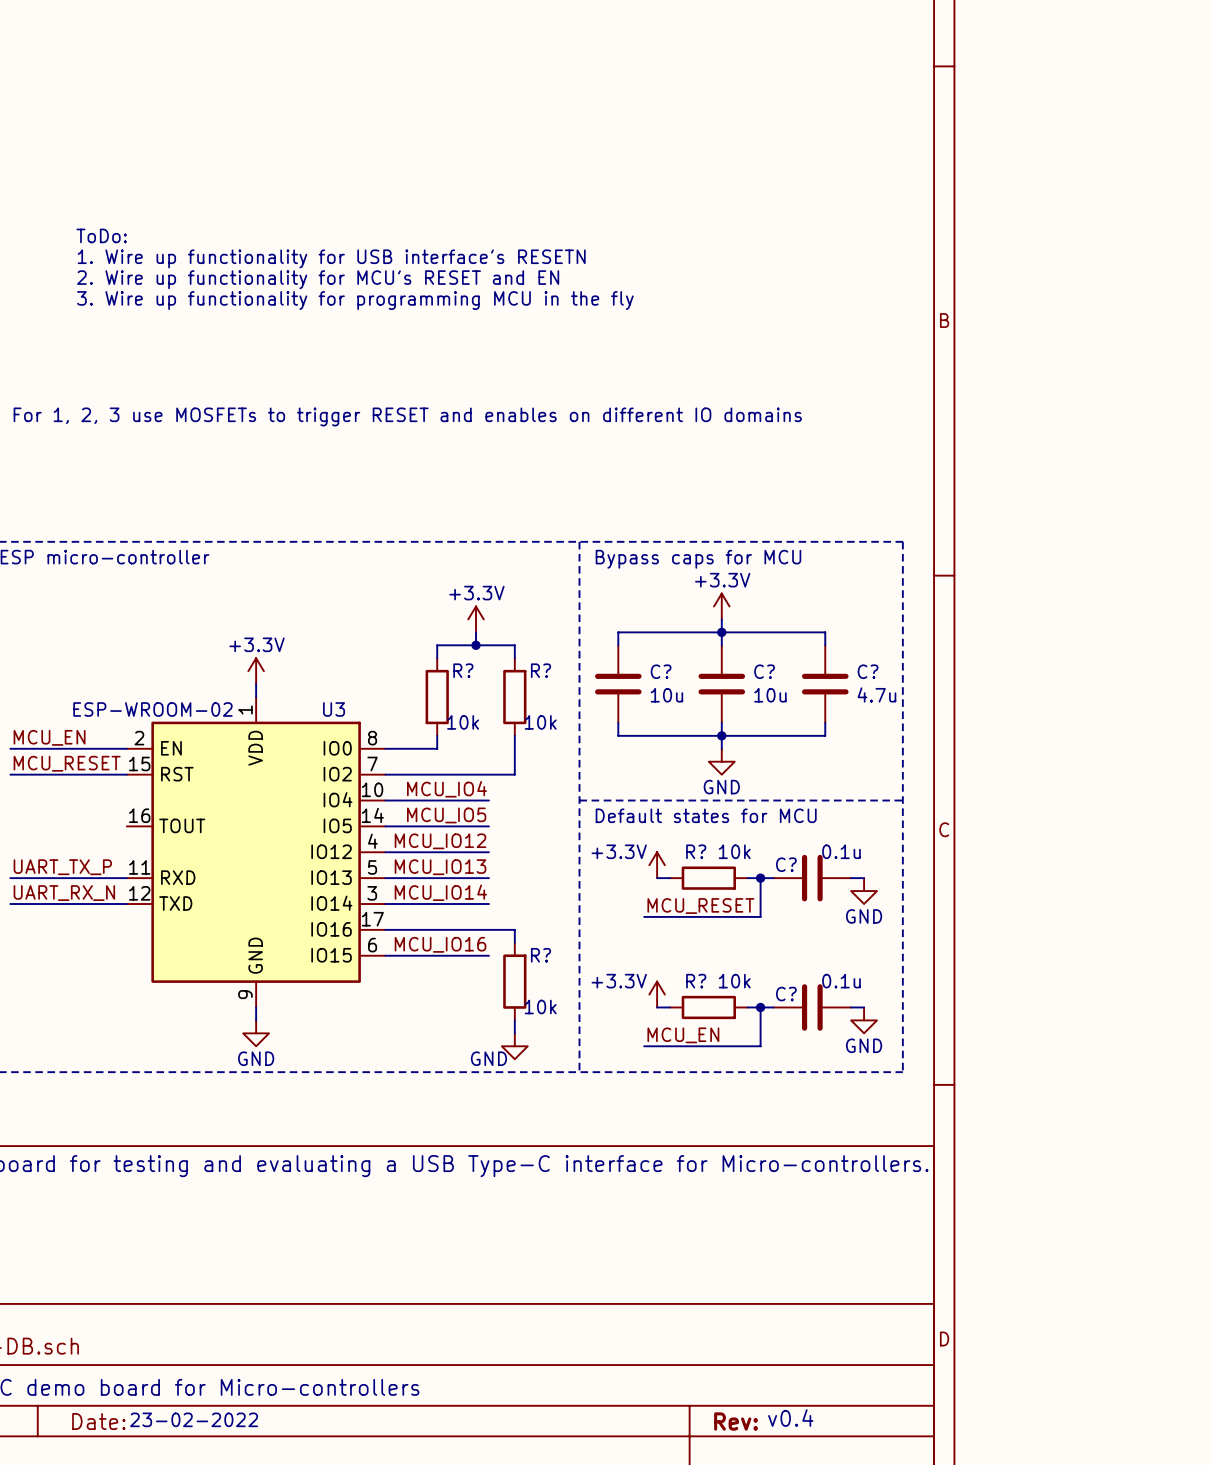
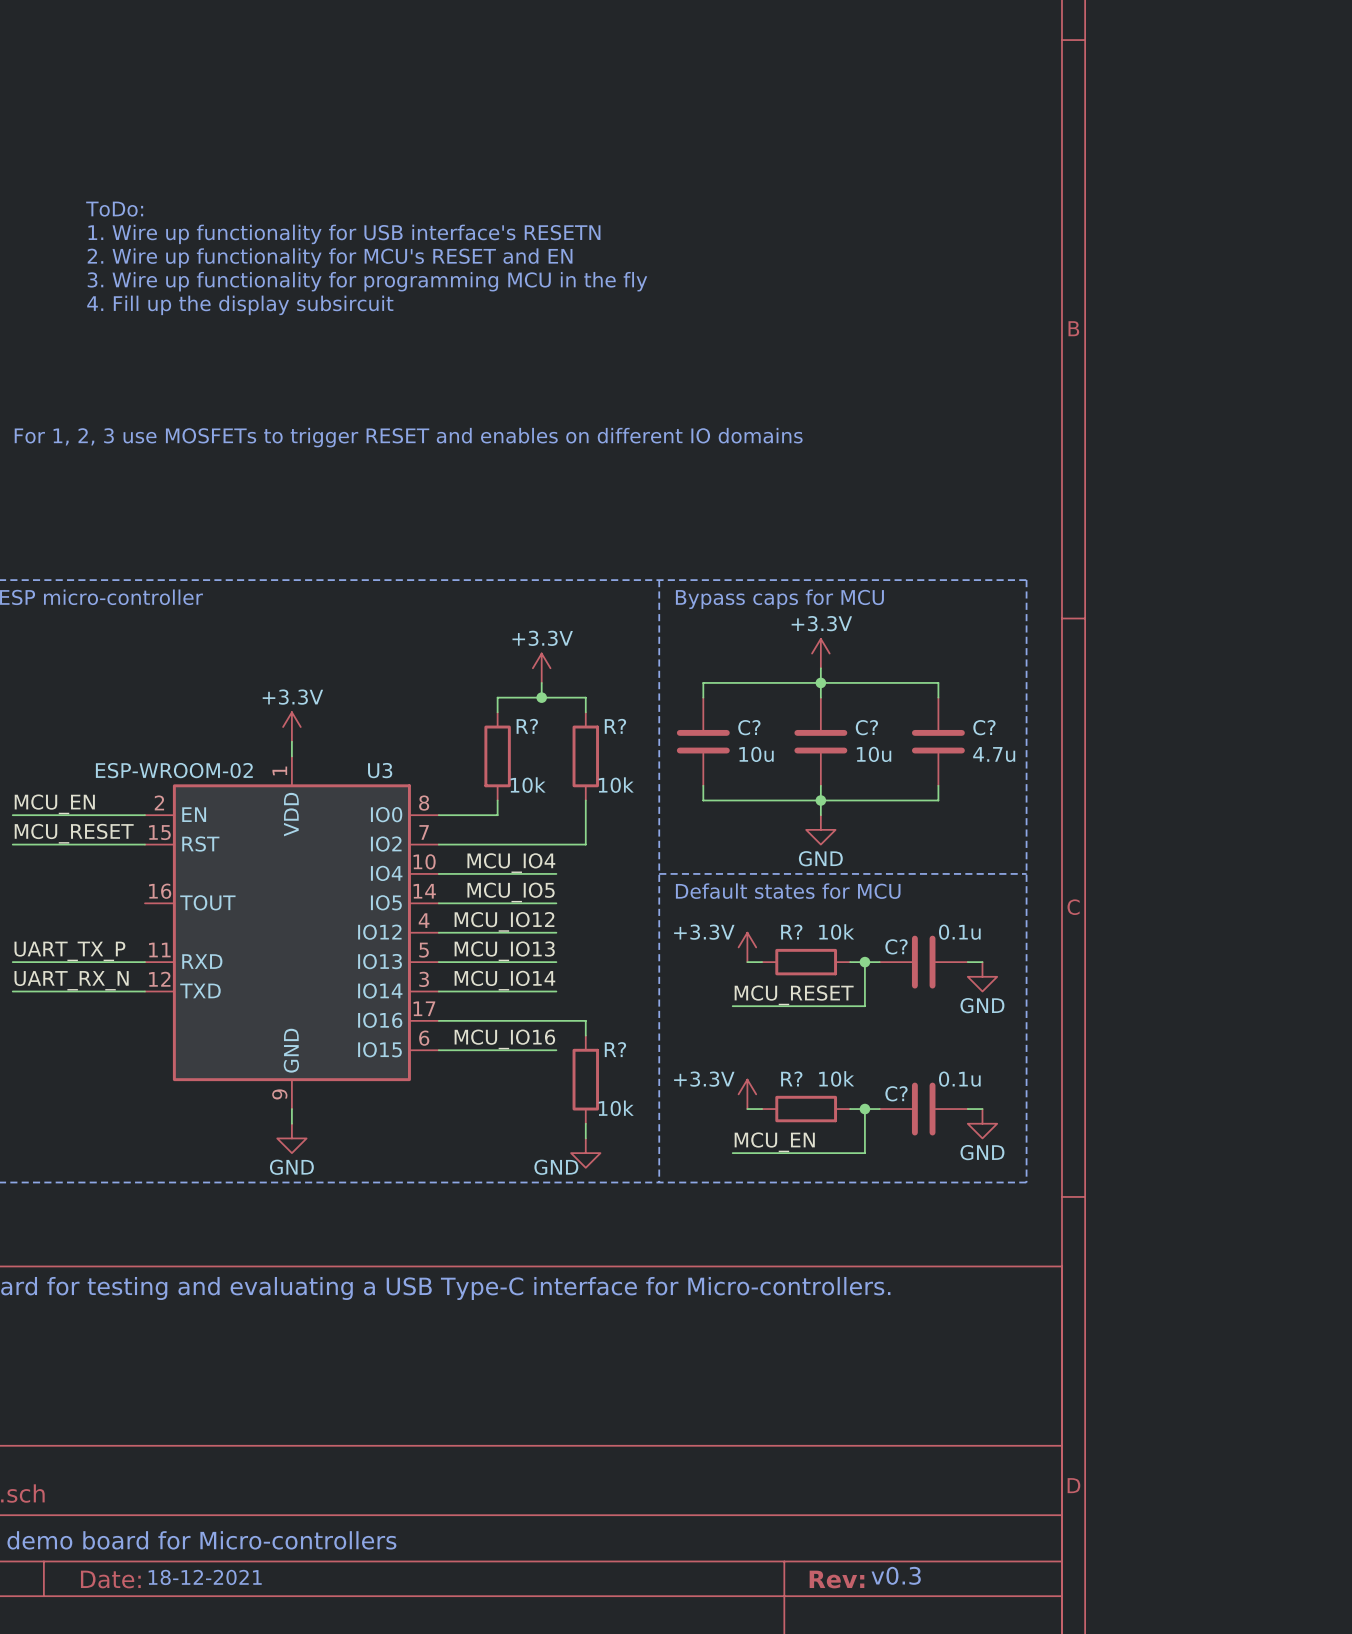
text: none -> ToDo: (114, 209)
text: ToDo: (101, 235) -> 1. Wire up functionality for USB interface's RESETN (344, 234)
text: 1. Wire up functionality for USB interface's RESETN (331, 258) -> 2. Wire up functionality for MCU's RESET and EN (330, 258)
text: 2. Wire up functionality for MCU's RESET and EN (318, 279) -> 3. Wire up functionality for programming MCU in the fly (367, 281)
text: 3. Wire up functionality for programming MCU in the fly (355, 300) -> 4. Fill up the display subsircuit (240, 305)
text: v0.4 (790, 1418) -> v0.3 (896, 1575)
text: 23-02-2022 (194, 1419) -> 18-12-2021 (205, 1577)

